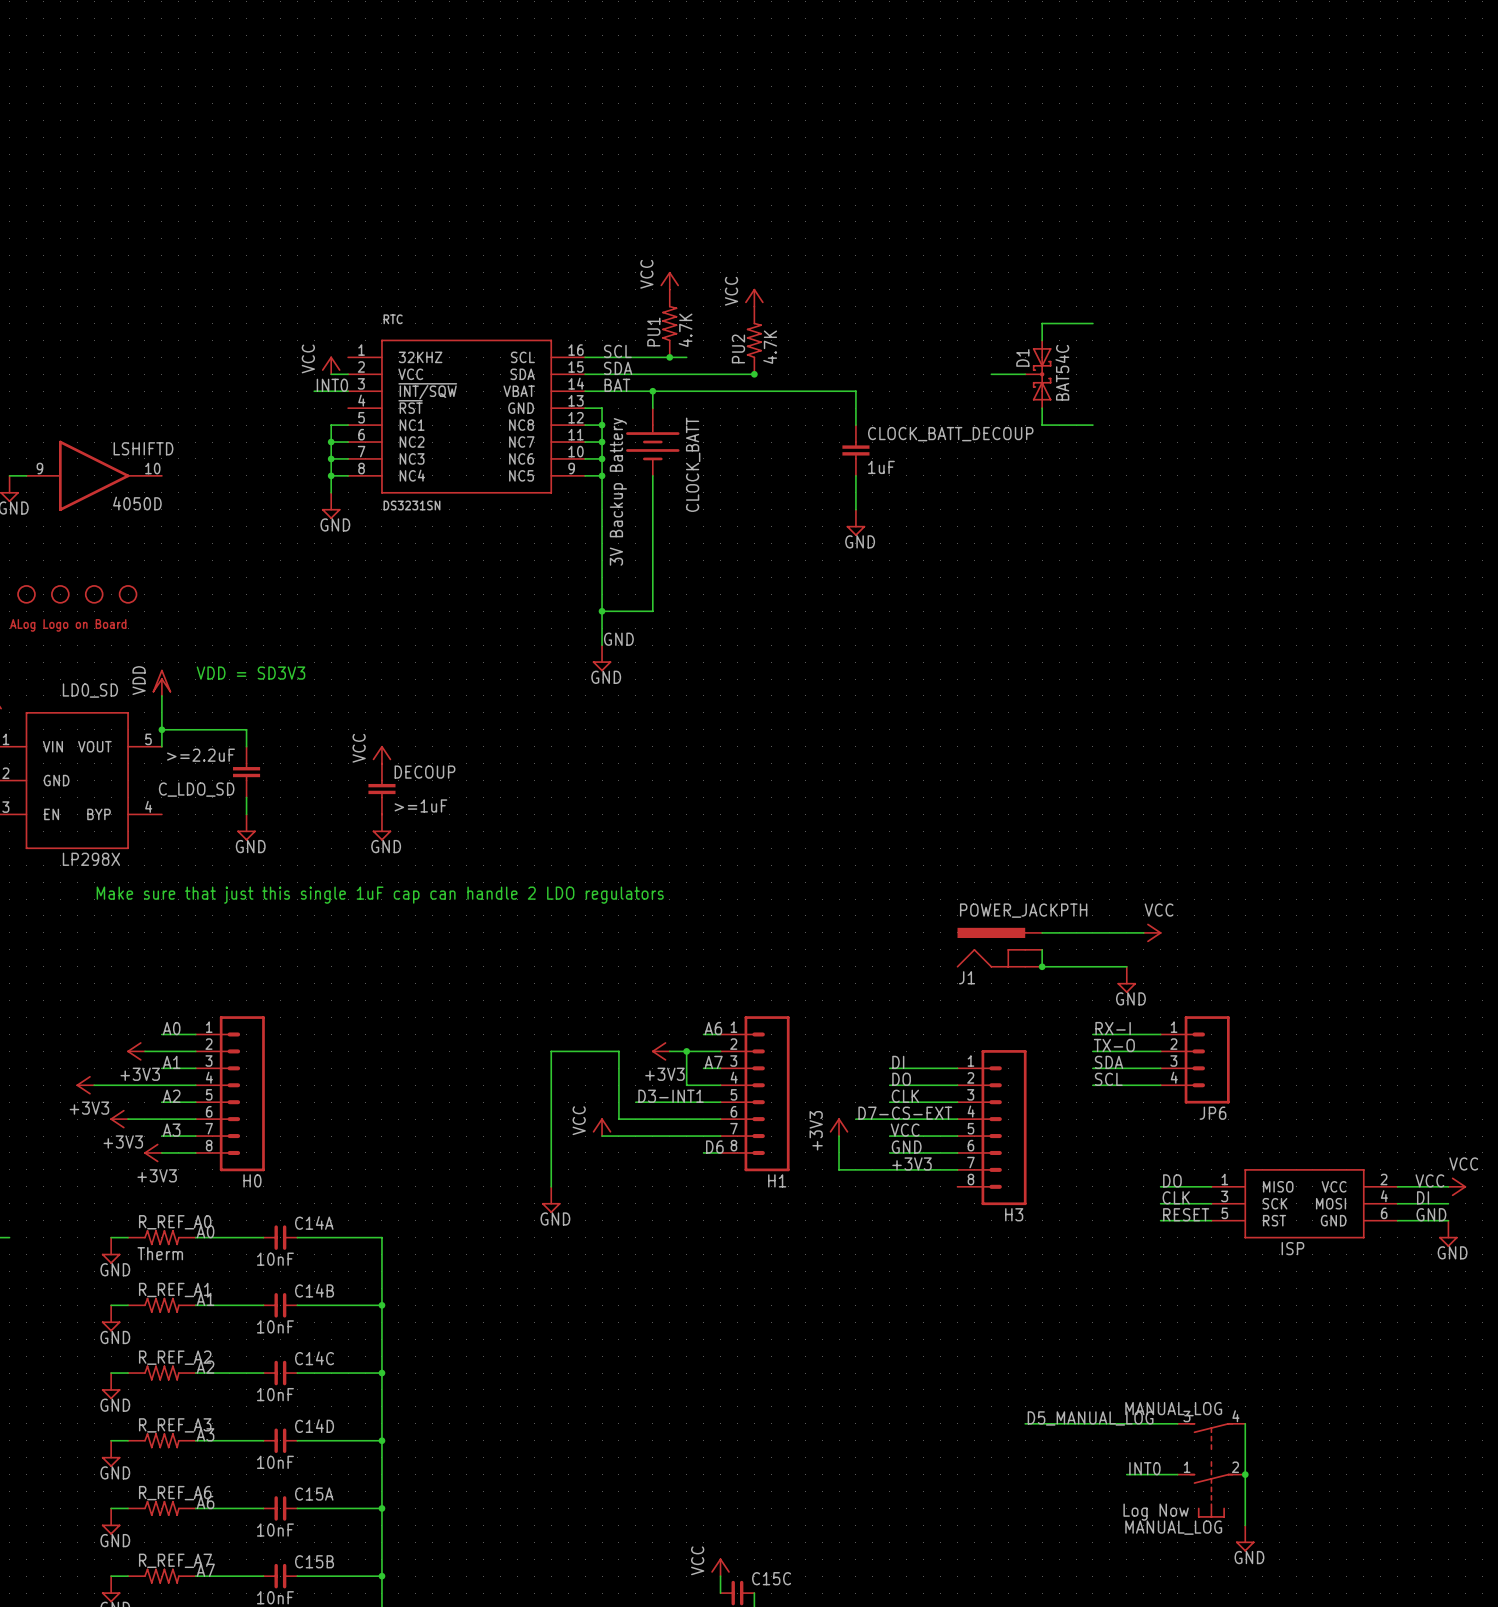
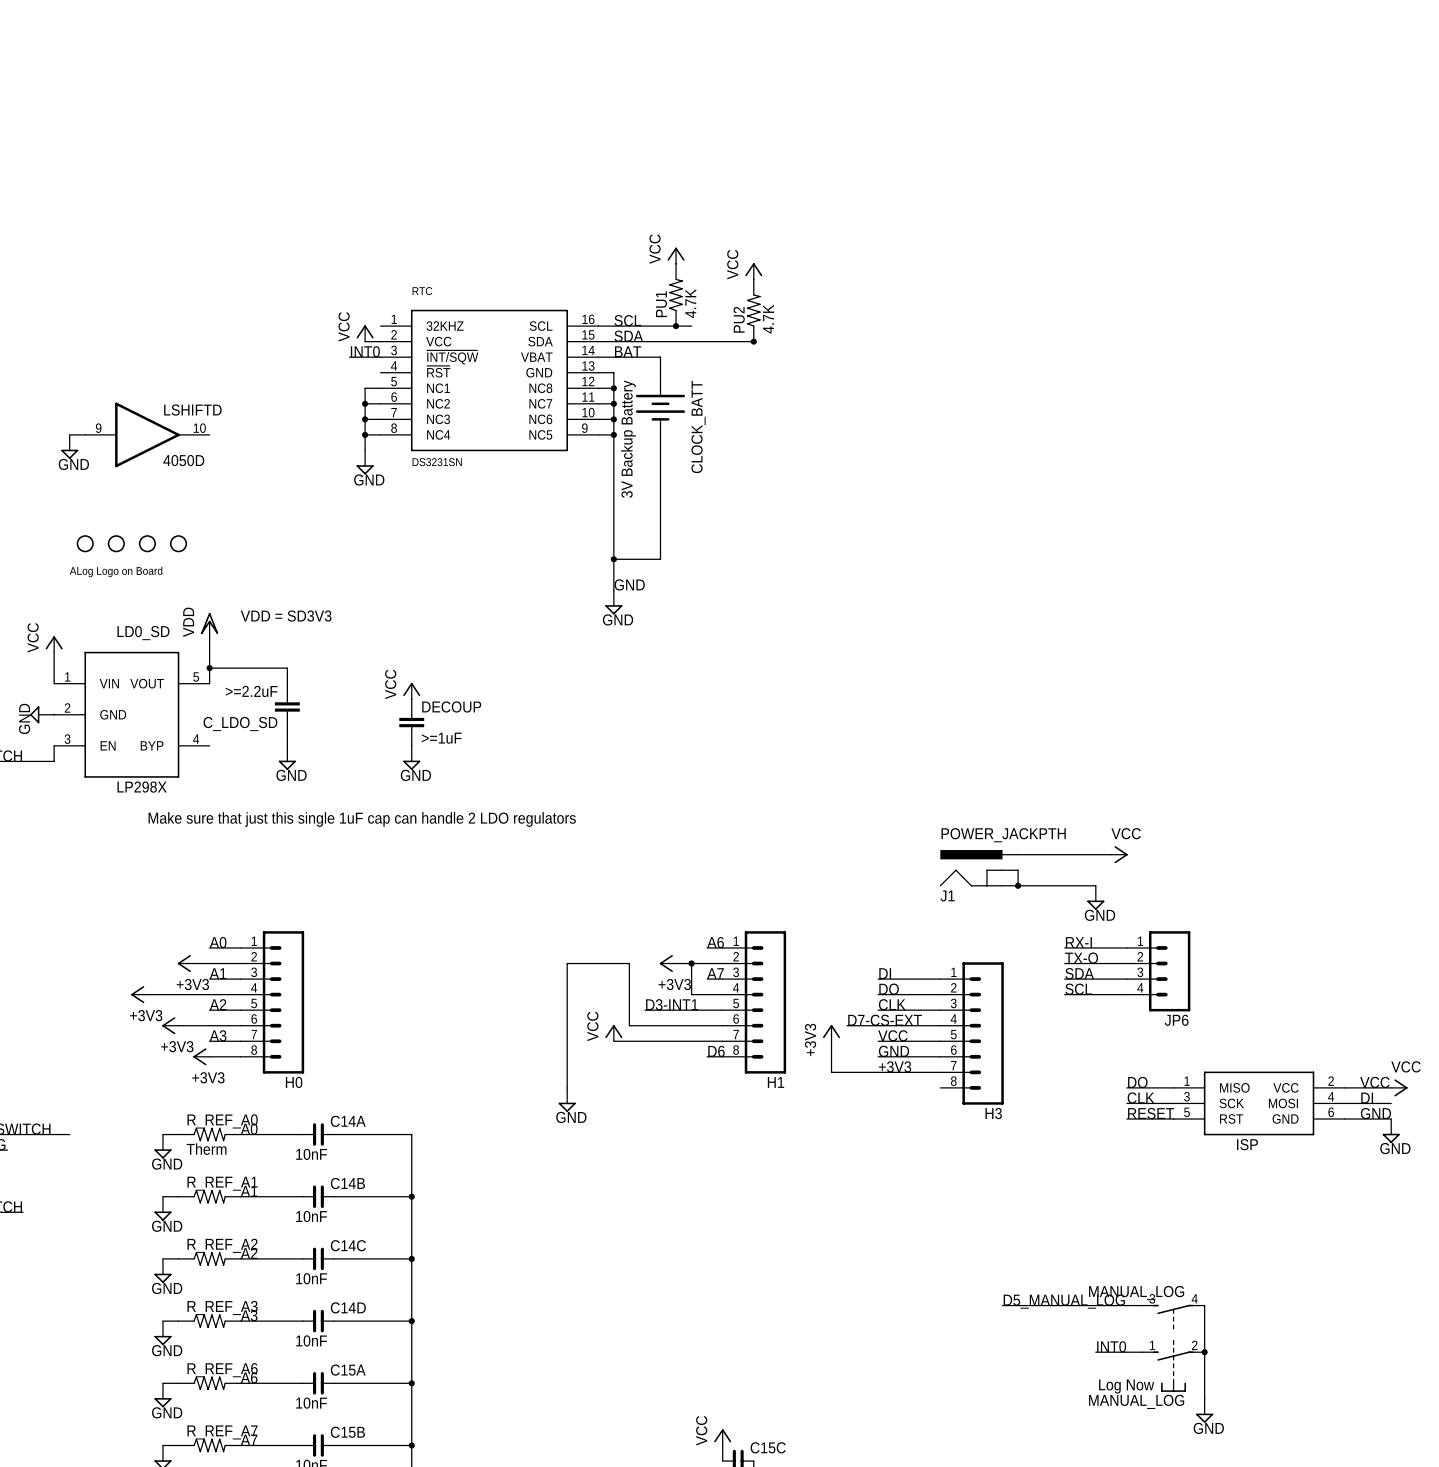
wire: (1092, 323) (1042, 323) (1042, 340) -> none
wire: (991, 374) (1025, 374) -> none
D1: BAT54C (1038, 374) -> none
wire: (652, 391) (855, 391) (855, 425) -> none
junction: (652, 391) -> none
wire: (1042, 408) (1042, 425) (1092, 425) -> none
CLOCK_BATT_DECOUP: 1uF (855, 450) -> none
wire: (855, 475) (855, 509) -> none
power symbol: GND (855, 522) -> none

